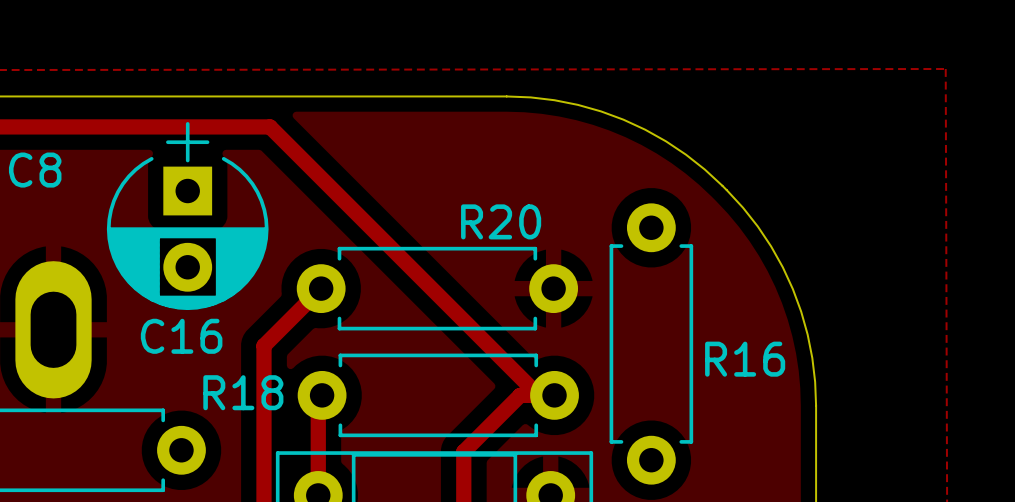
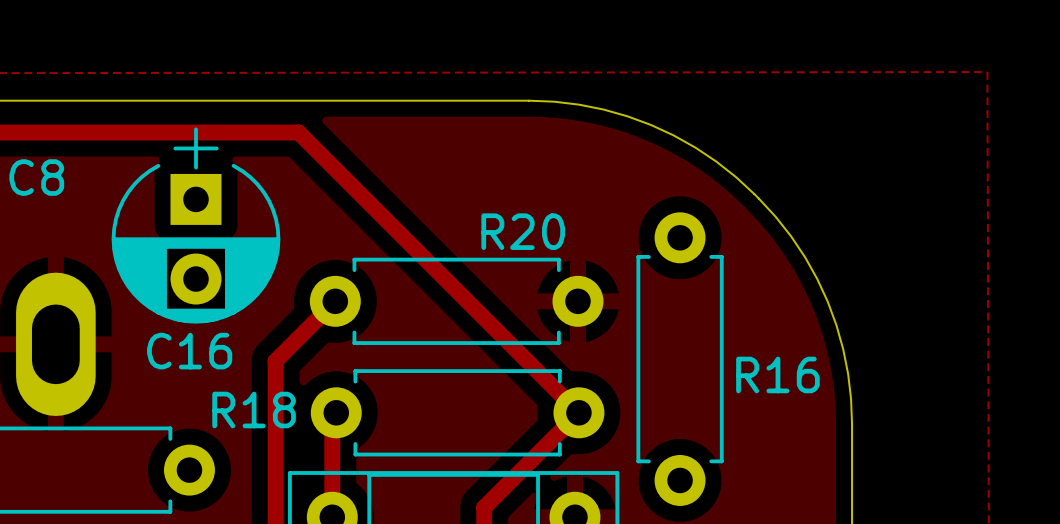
track: (270, 126) (538, 395) -> (281, 132) (298, 132) (578, 412) (484, 507)
track: (554, 395) (520, 395) (463, 451) (463, 486) -> none

